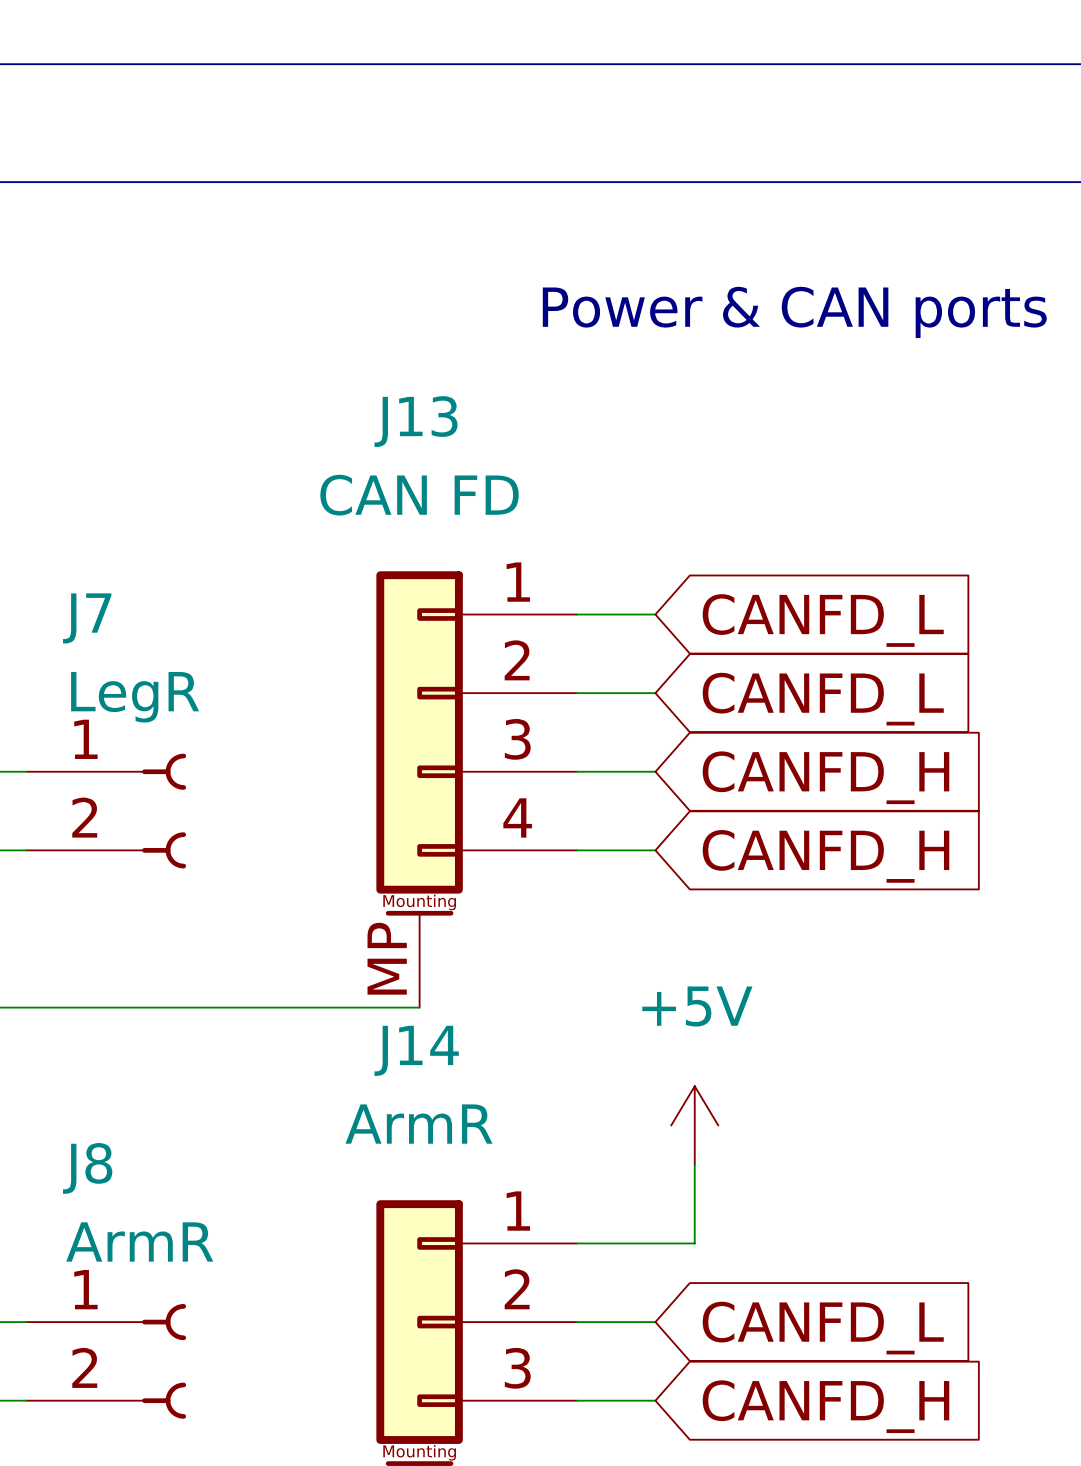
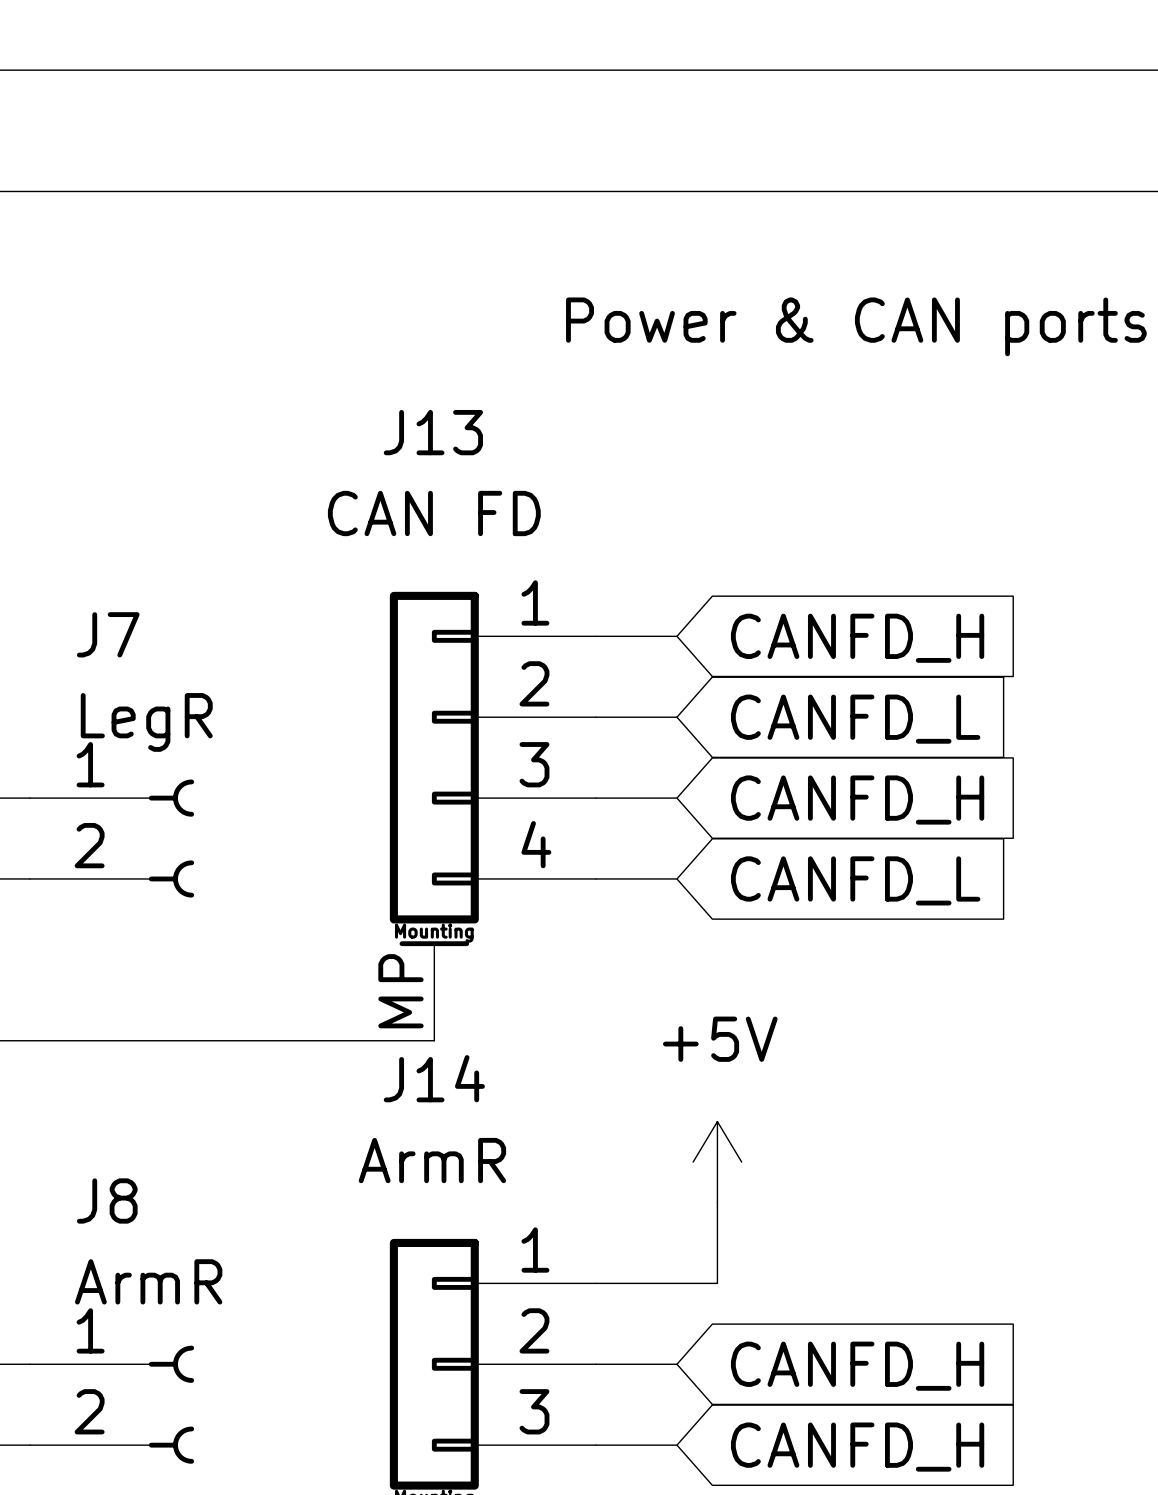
global label: CANFD_L (823, 620) -> CANFD_H (857, 638)
global label: CANFD_H (825, 856) -> CANFD_L (855, 880)
global label: CANFD_L (823, 1328) -> CANFD_H (857, 1366)

